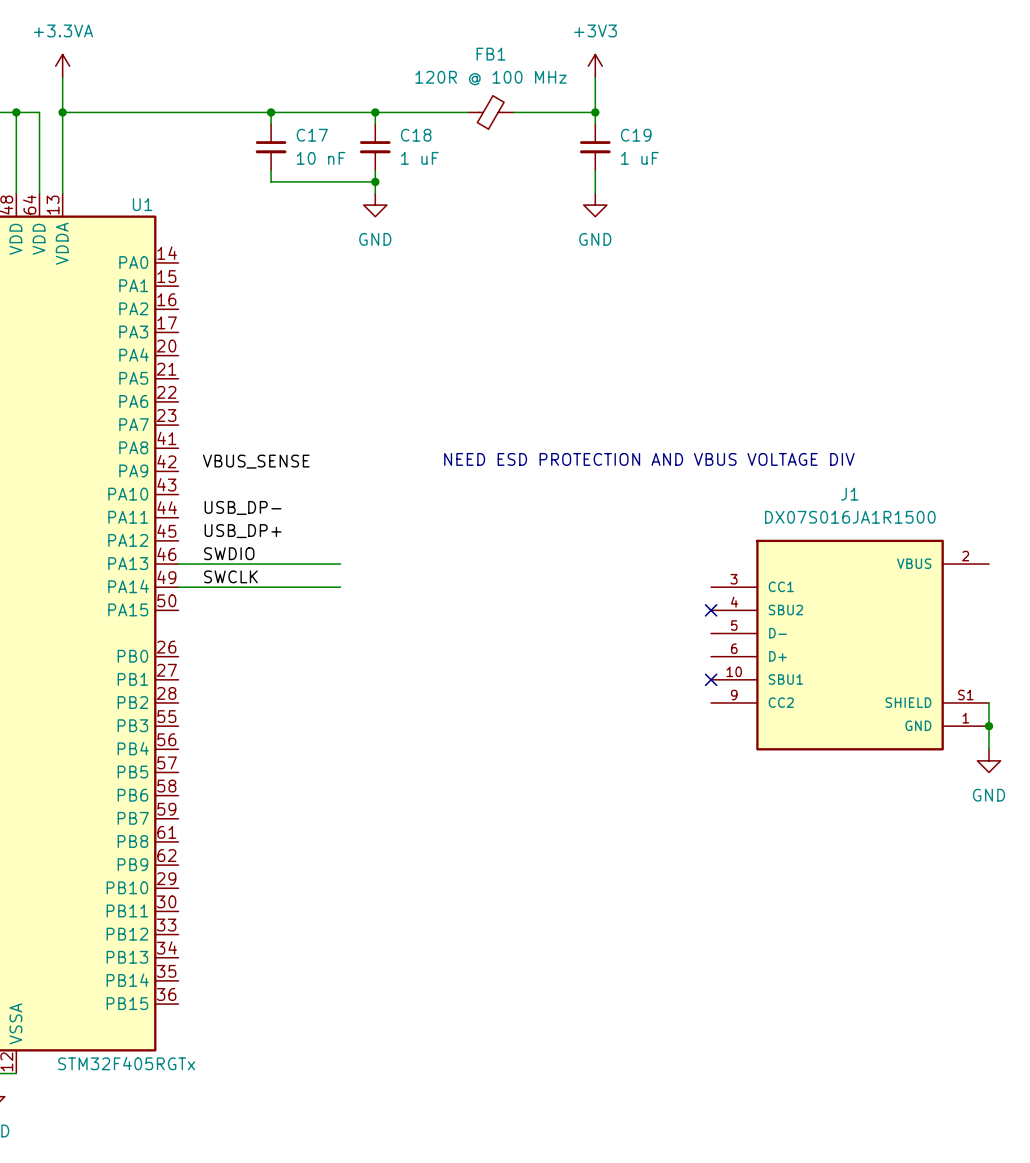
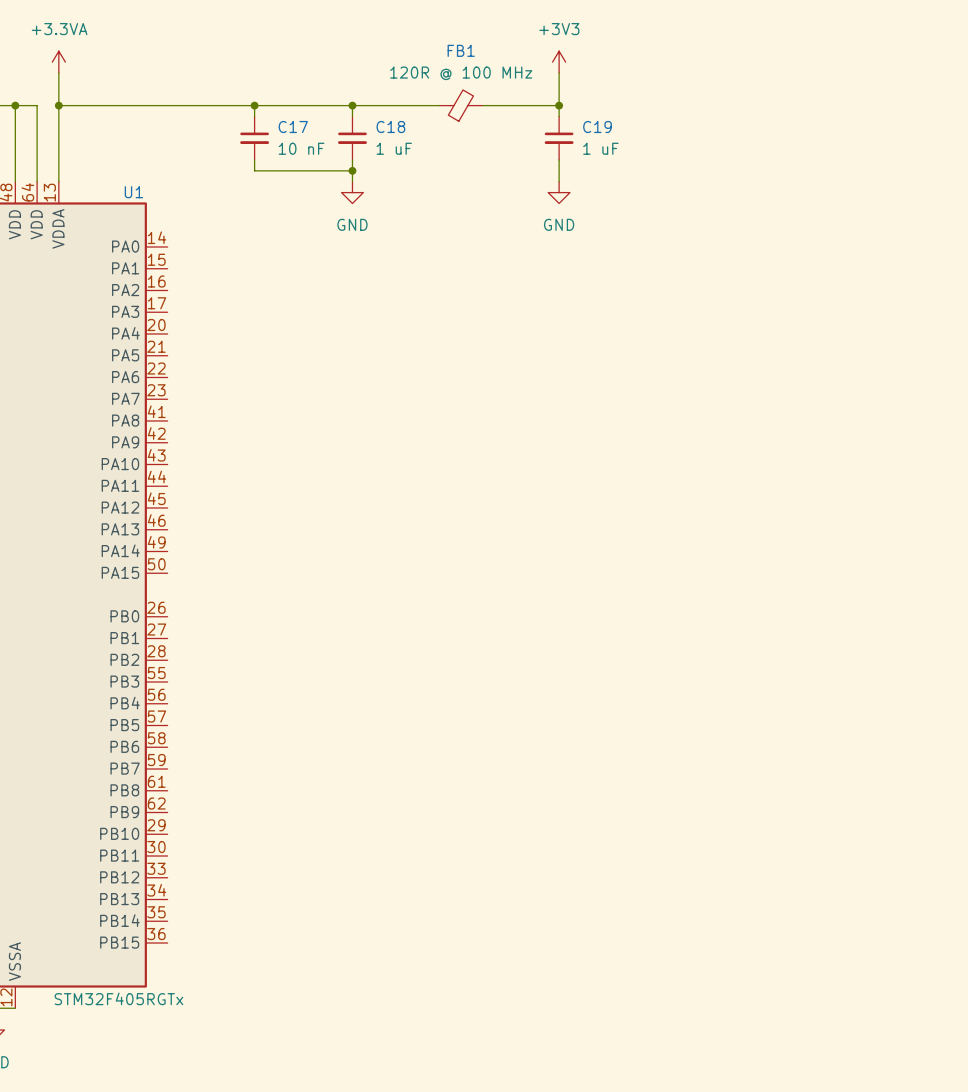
text: NEED ESD PROTECTION AND VBUS VOLTAGE DIV (649, 459) -> none
label: VBUS_SENSE (256, 461) -> none
label: USB_DP- (243, 507) -> none
label: USB_DP+ (243, 531) -> none
label: SWDIO (229, 553) -> none
wire: (178, 564) (340, 564) -> none
label: SWCLK (230, 576) -> none
wire: (178, 587) (340, 587) -> none
no-connect mark: (711, 610) -> none
J1: DX07S016JA1R1500 (850, 645) -> none
no-connect mark: (711, 679) -> none
wire: (988, 702) (988, 749) -> none
junction: (988, 726) -> none
power symbol: GND (988, 760) -> none

